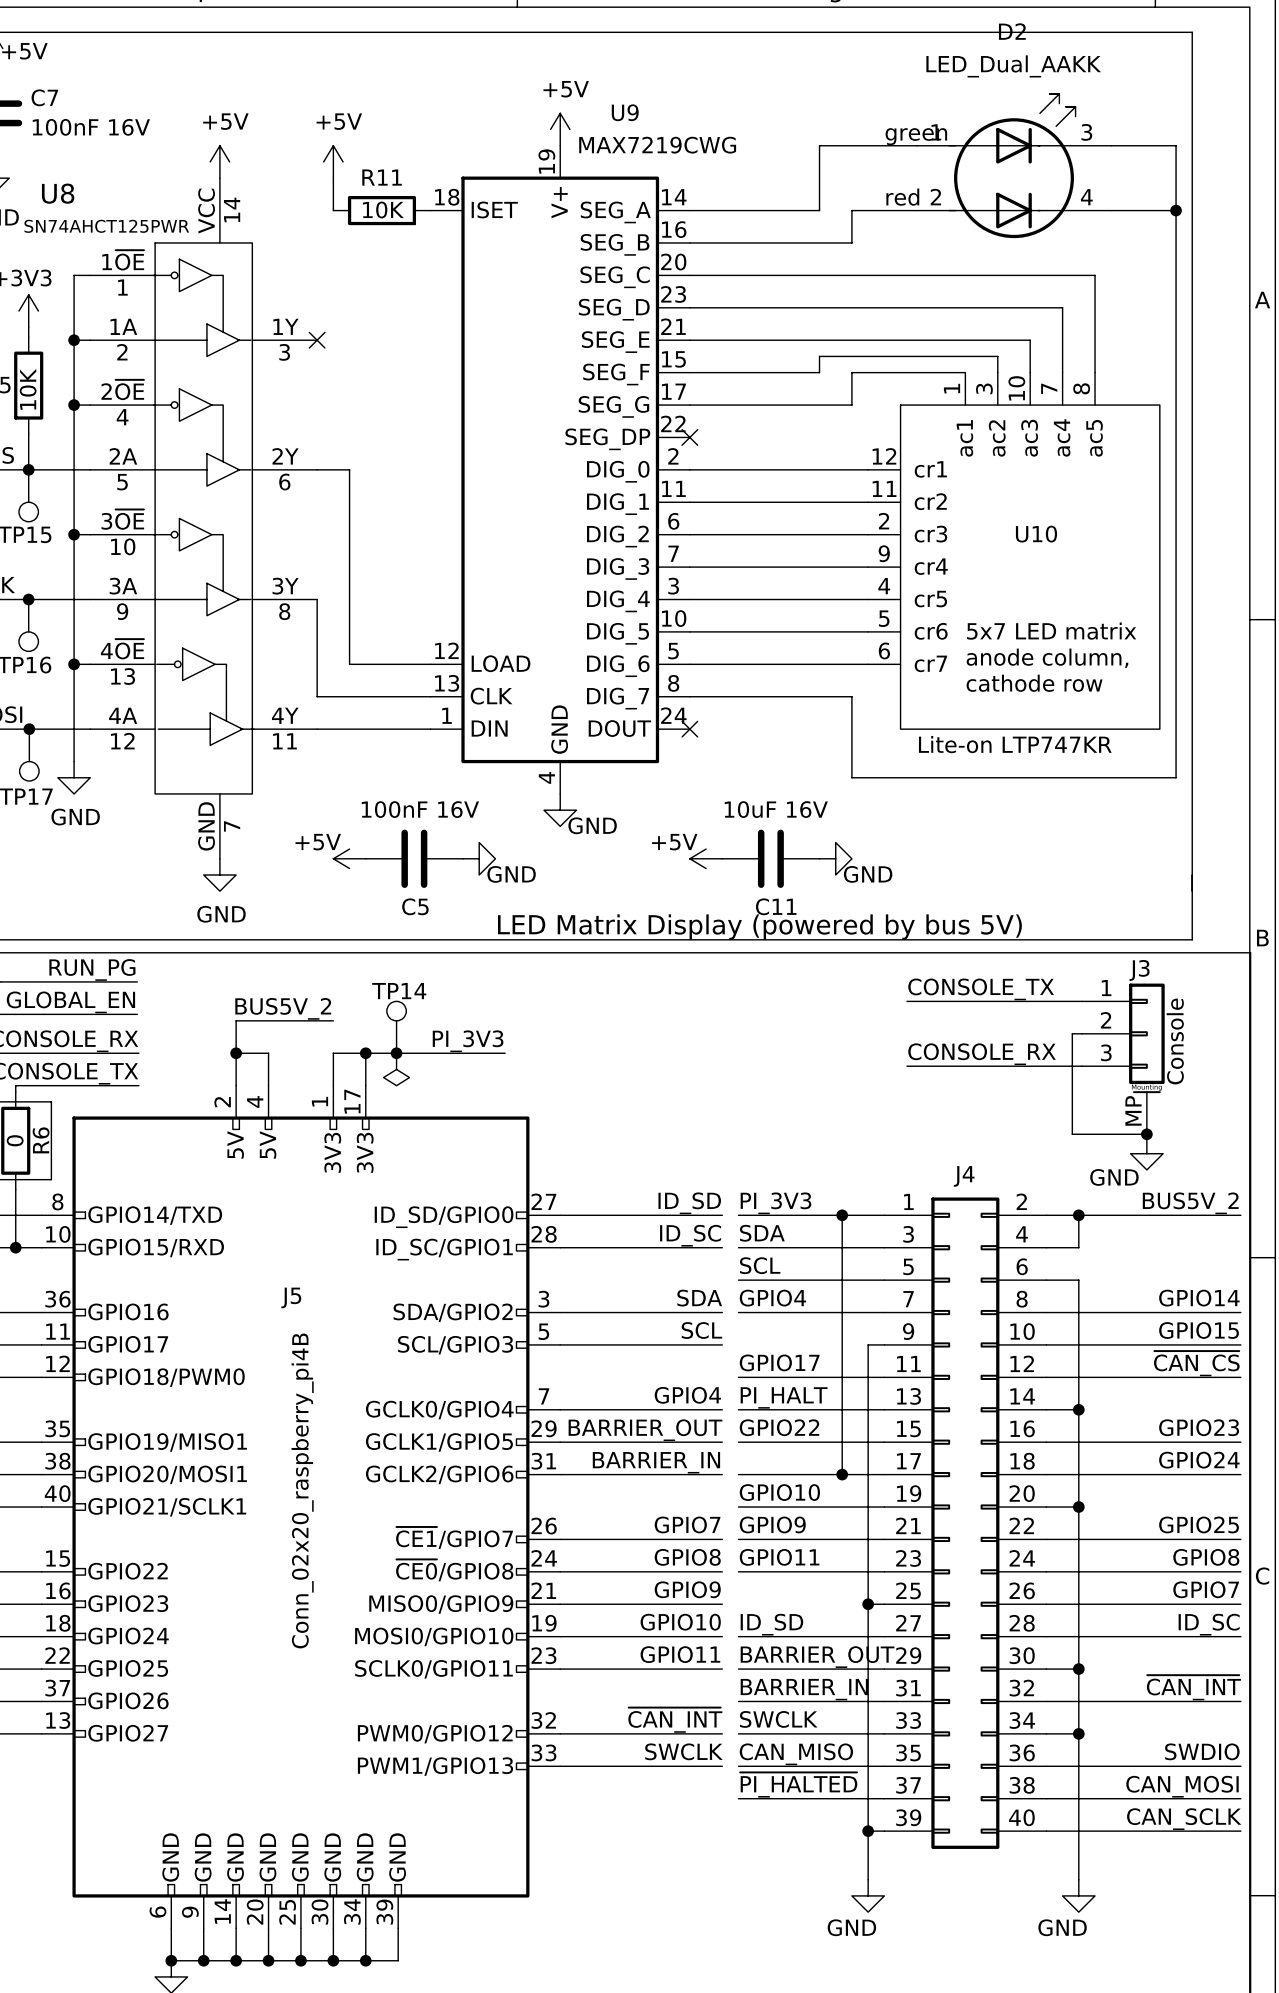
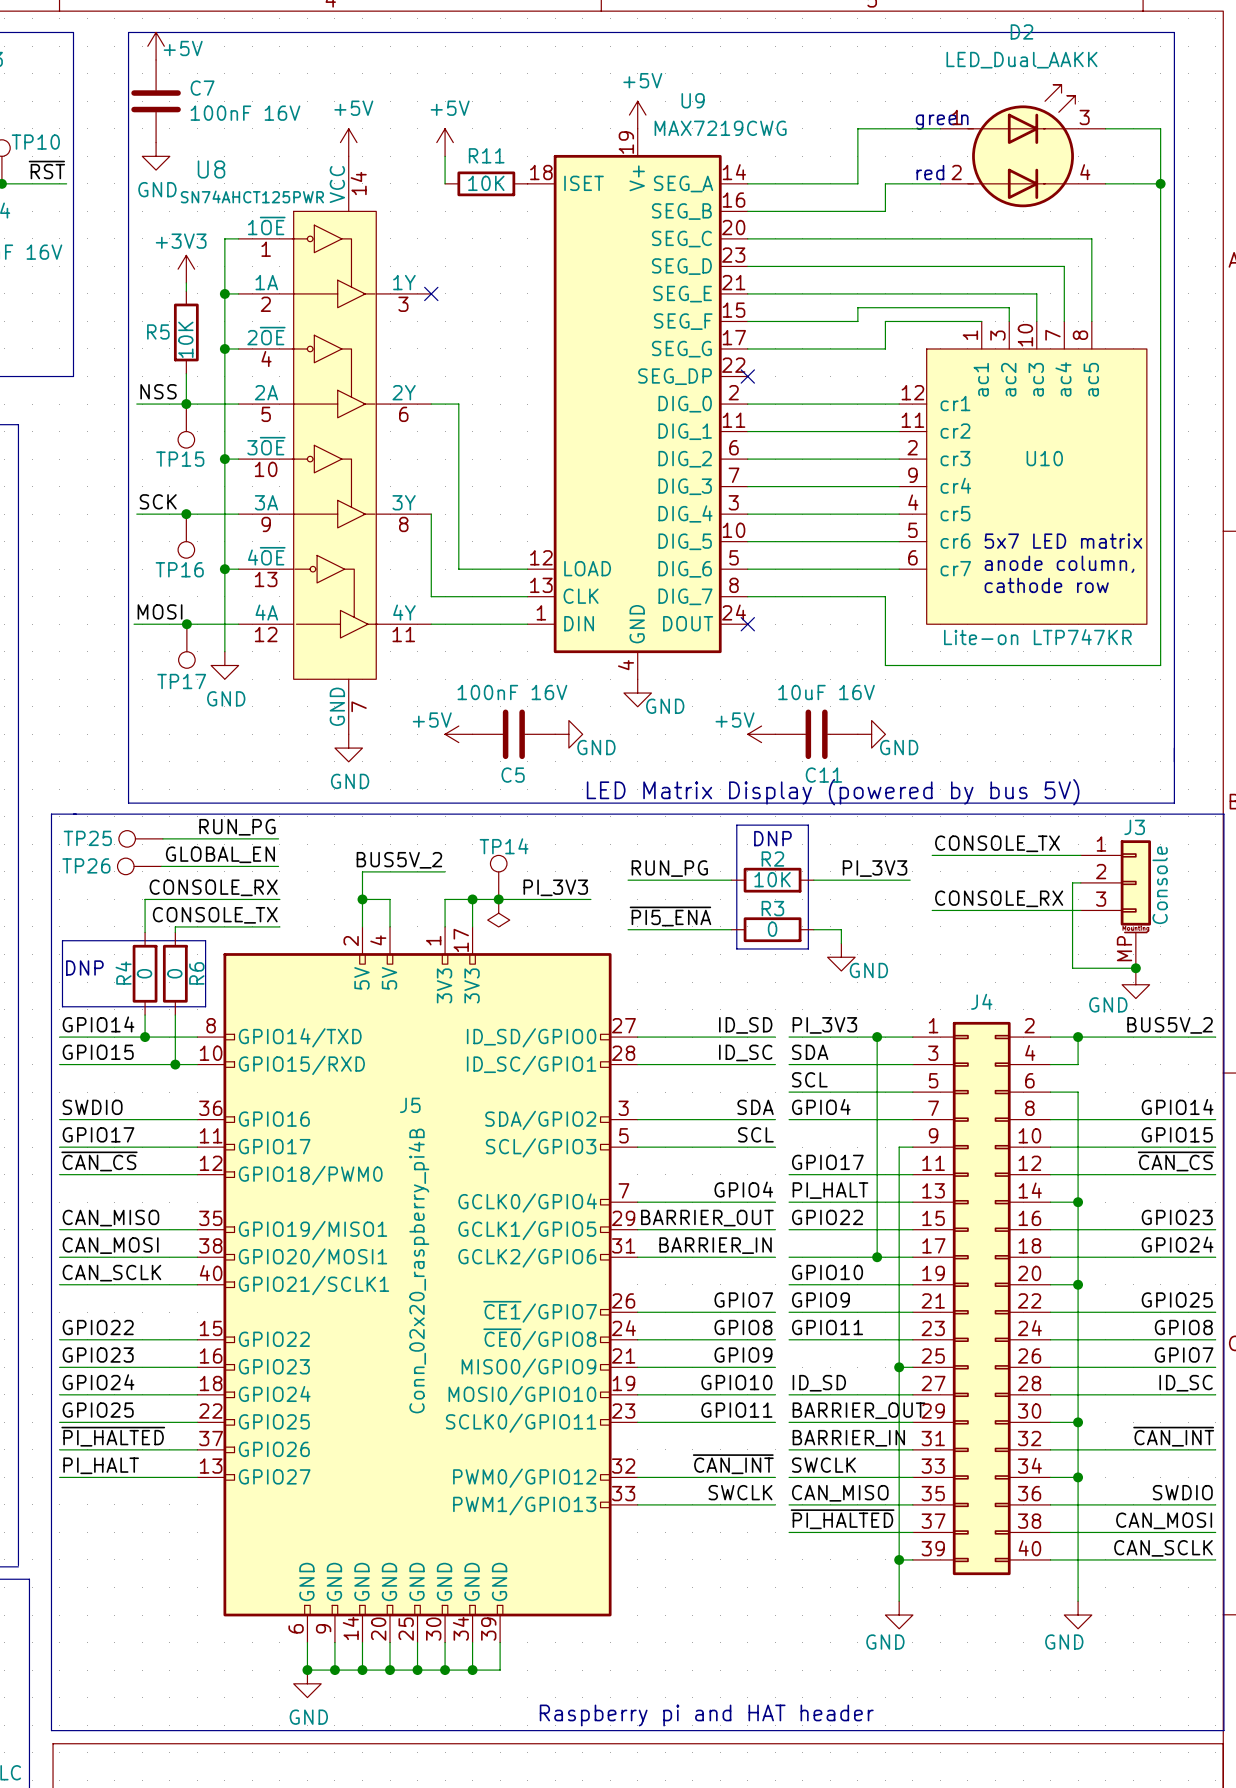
line: none -> (736, 825) (808, 825) (808, 948) (736, 948) (736, 825)
text: none -> DNP (772, 838)
label: none -> RUN_PG (669, 868)
label: none -> PI_3V3 (875, 868)
wire: none -> (628, 880) (731, 880)
R2: none -> 10K (772, 880)
wire: none -> (813, 880) (910, 880)
label: none -> ~{PI5_ENA} (670, 916)
wire: none -> (628, 929) (731, 929)
R3: none -> 0 (772, 929)
wire: none -> (813, 929) (841, 929) (841, 943)
power symbol: none -> GND (841, 957)

